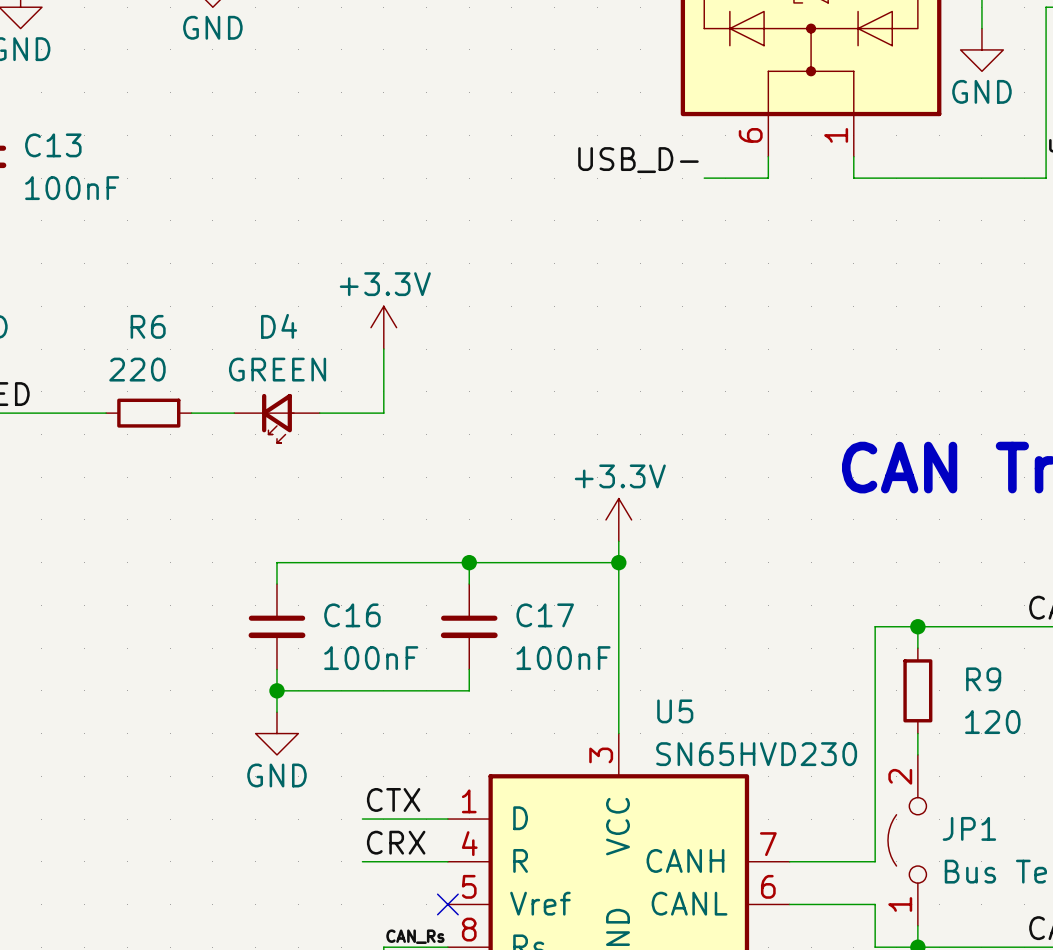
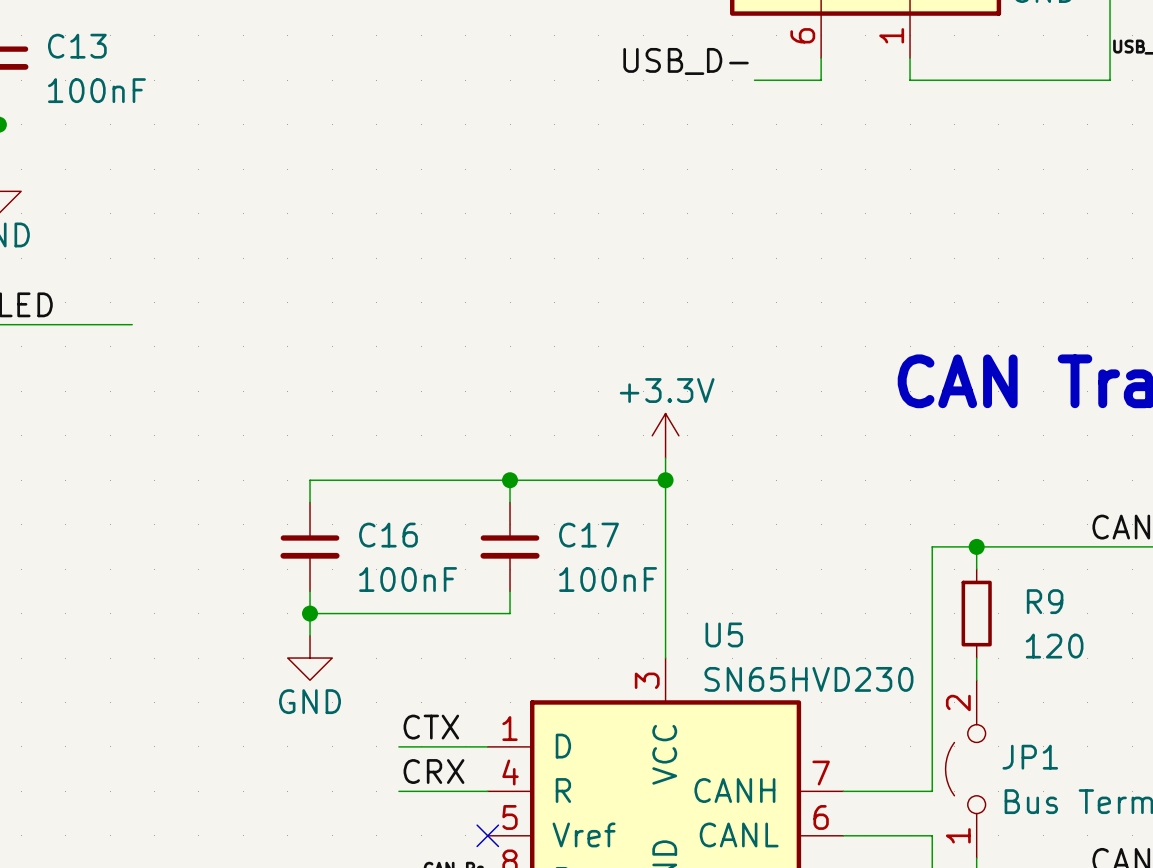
power symbol: +3.3V (383, 327) -> none
wire: (383, 349) (383, 413) (319, 413) -> none
R6: 220 (148, 413) -> none
wire: (191, 413) (234, 413) -> none
D4: GREEN (276, 418) -> none

